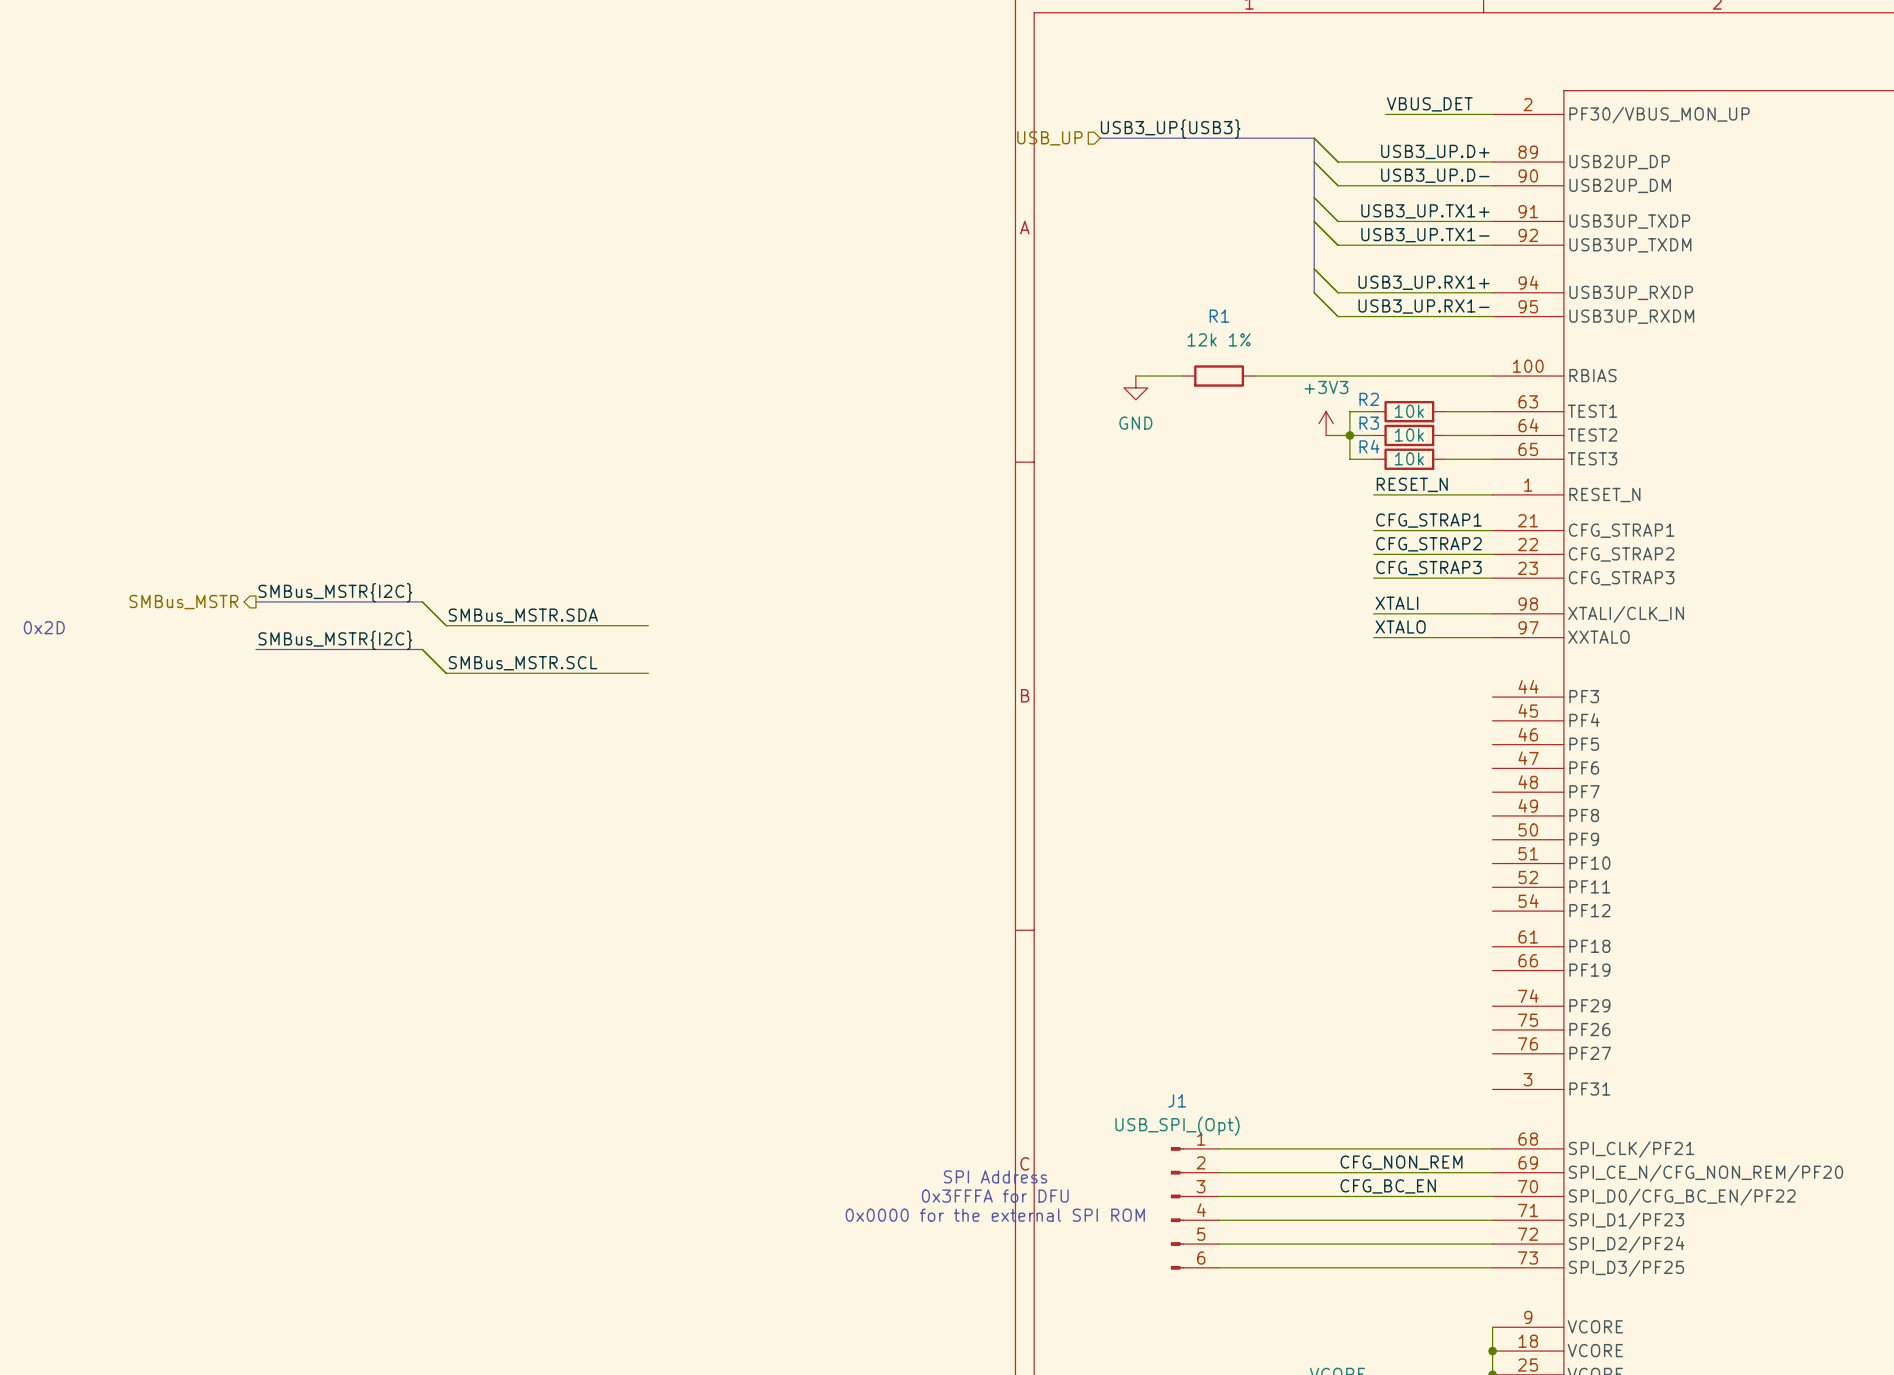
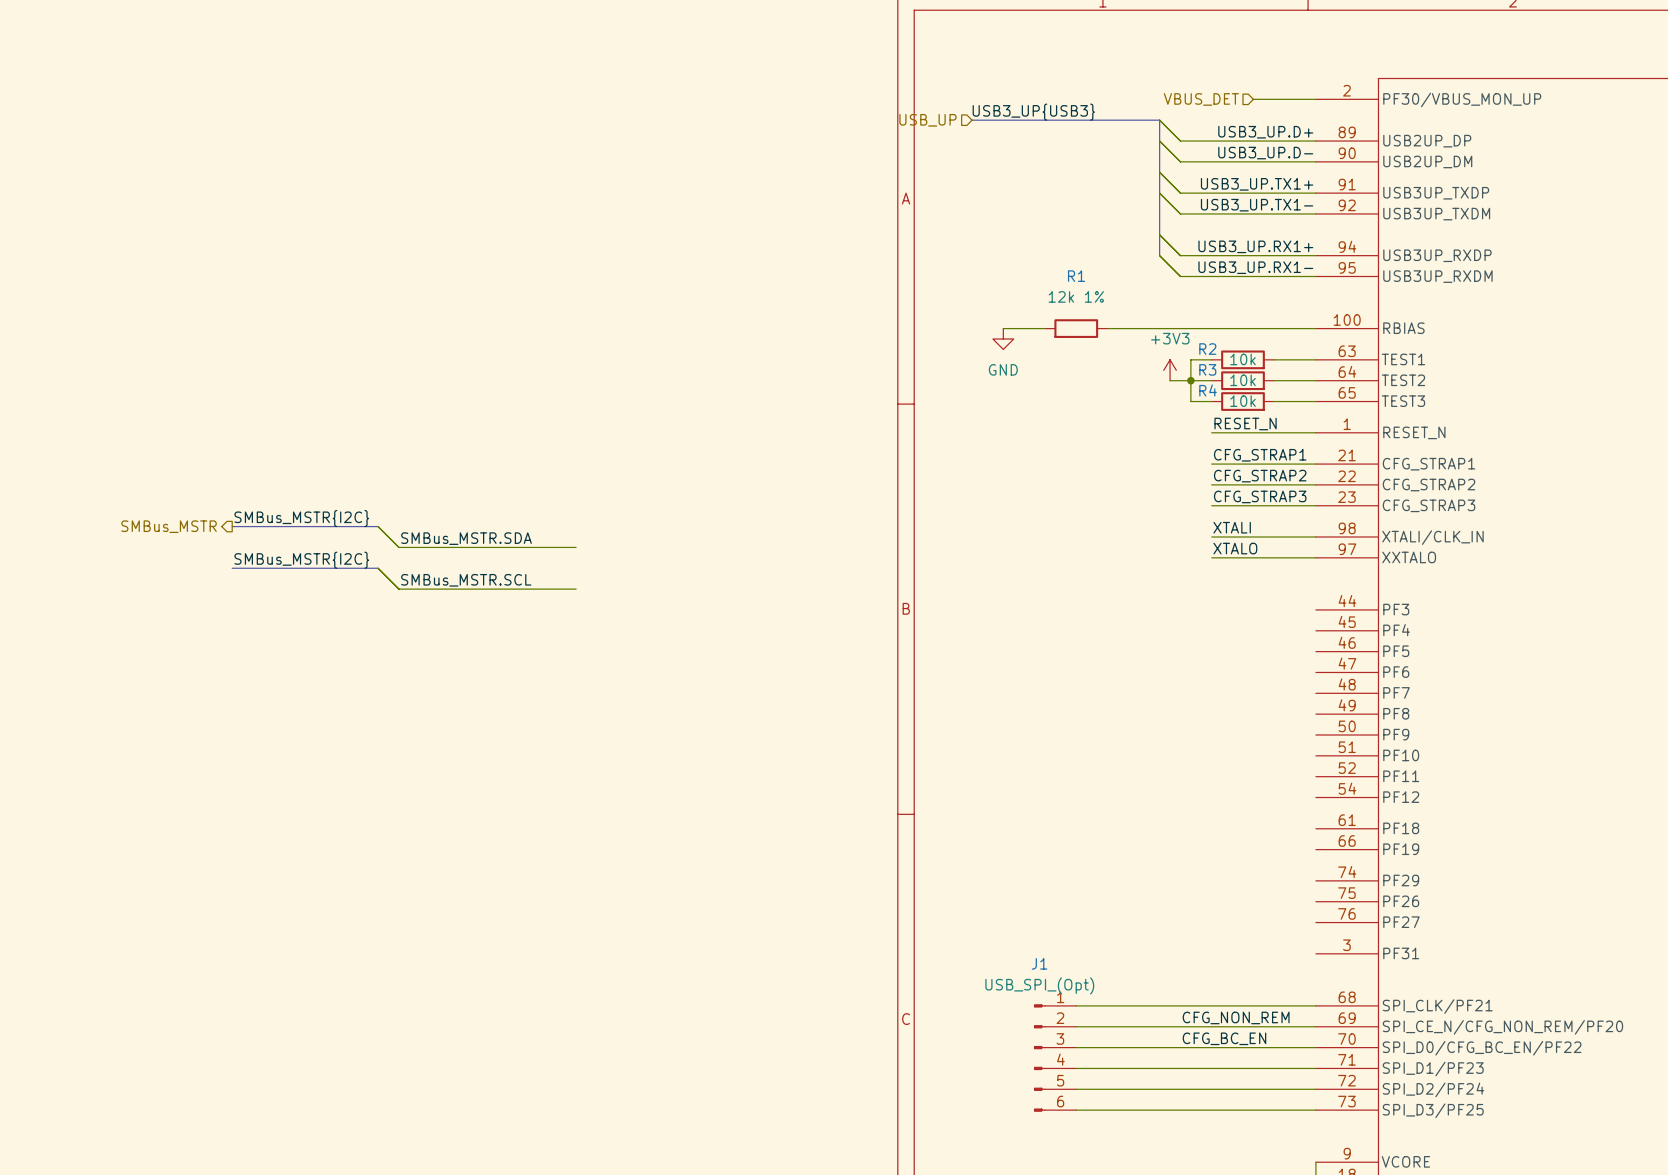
label: VBUS_DET (1429, 104) -> none
hierarchical label: none -> VBUS_DET (1201, 99)
wire: (1385, 114) (1421, 114) -> none
text: 0x2D (44, 627) -> none
text: SPI Address (995, 1176) -> none
text: 0x3FFFA for DFU (995, 1196) -> none
text: 0x0000 for the external SPI ROM (995, 1215) -> none

